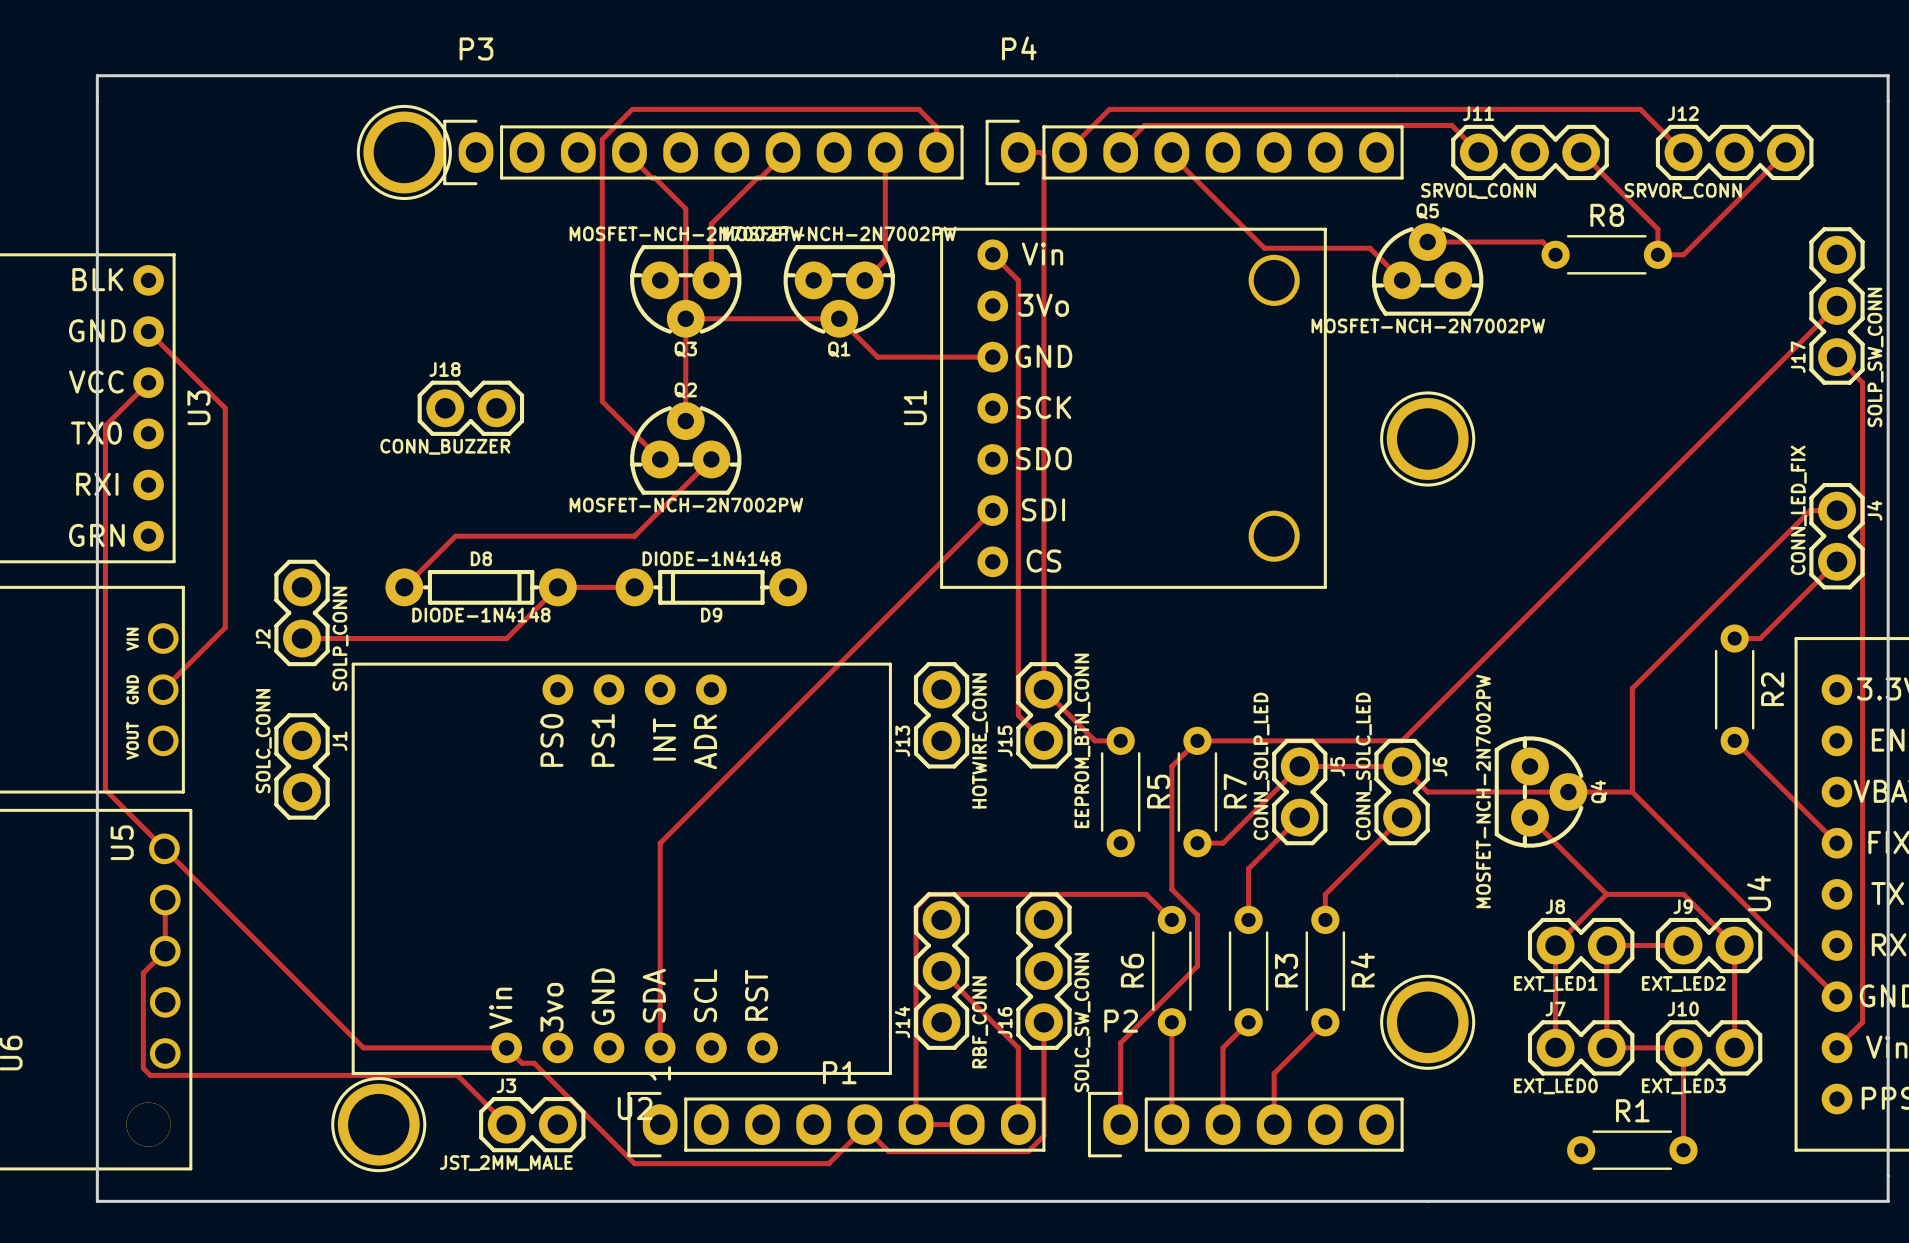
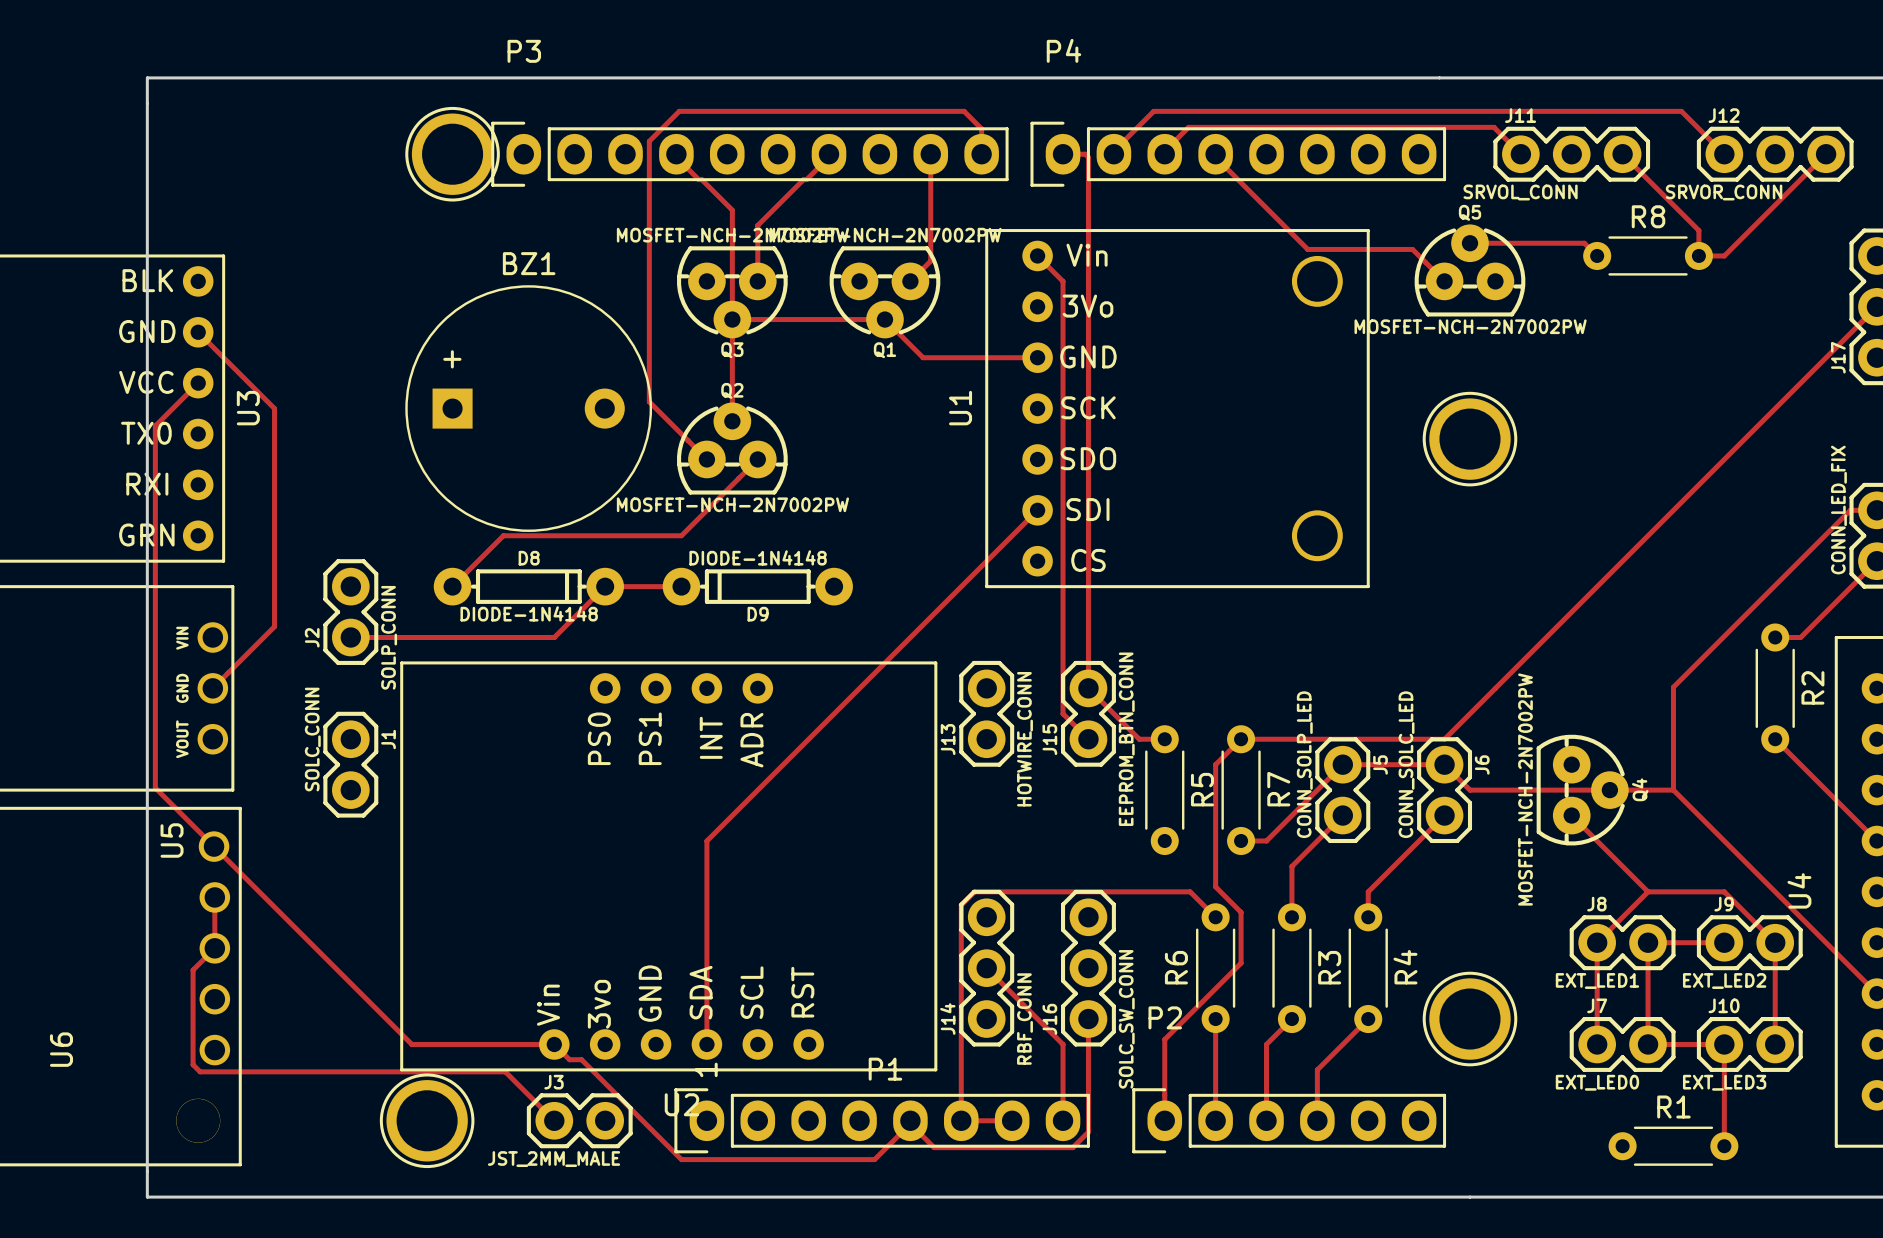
J18: CONN_BUZZER (470, 408) -> none
BZ1: none -> (528, 408)

